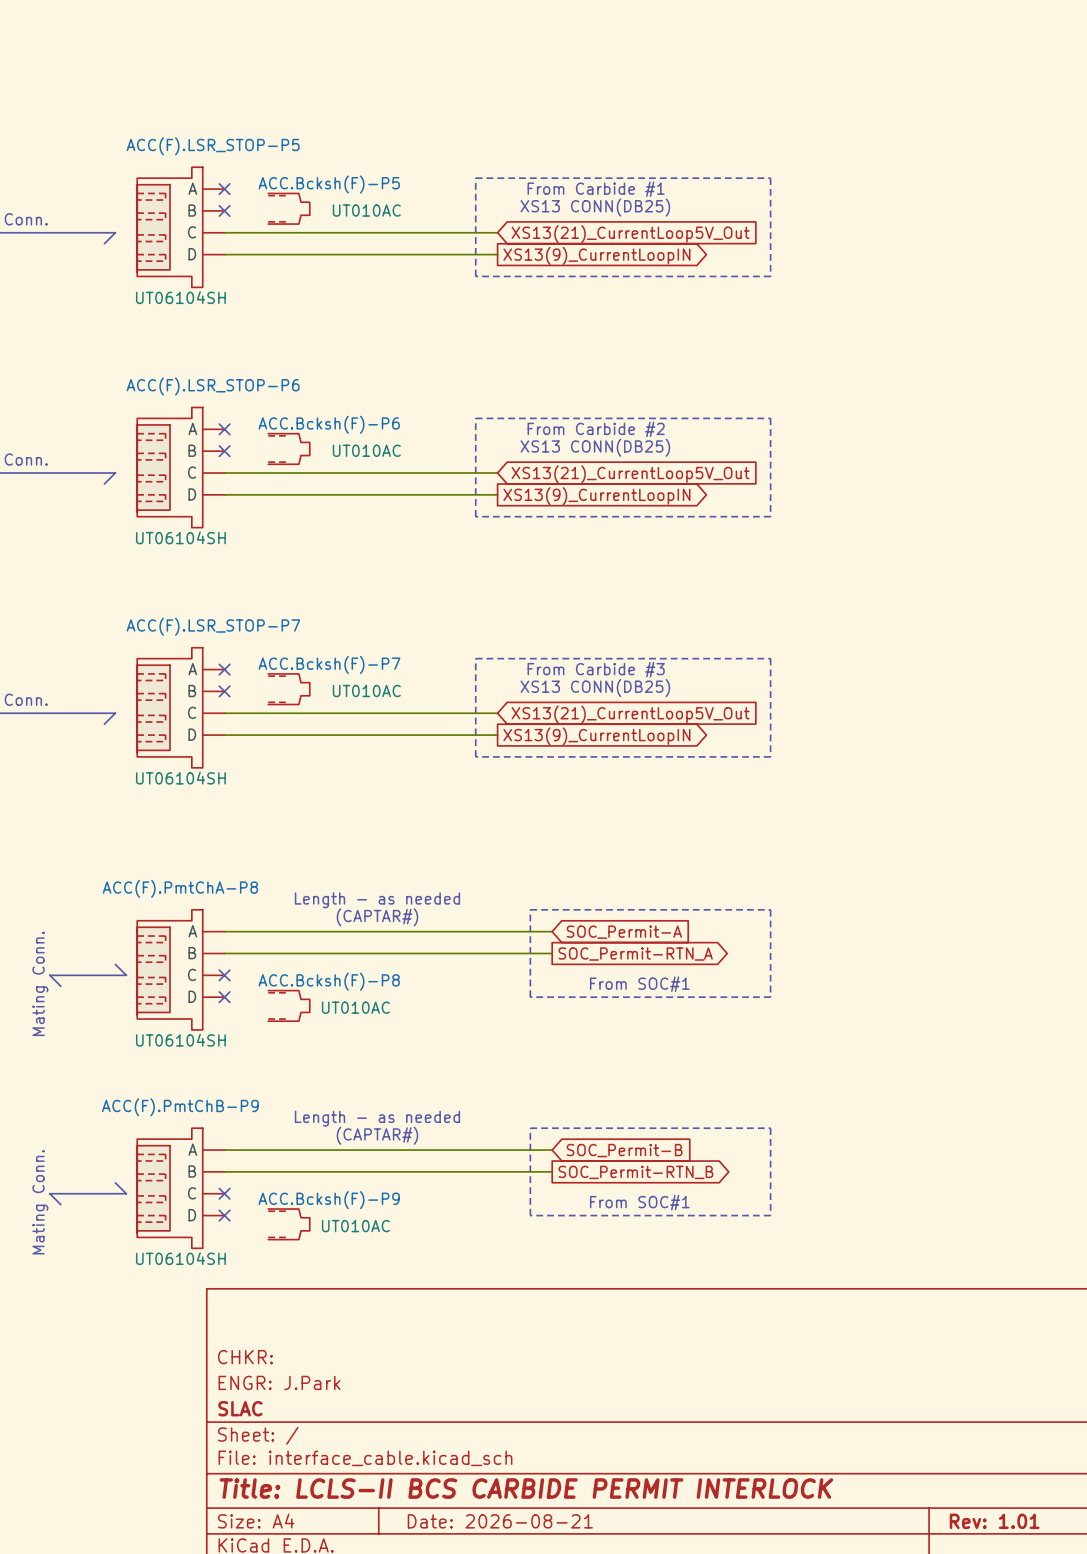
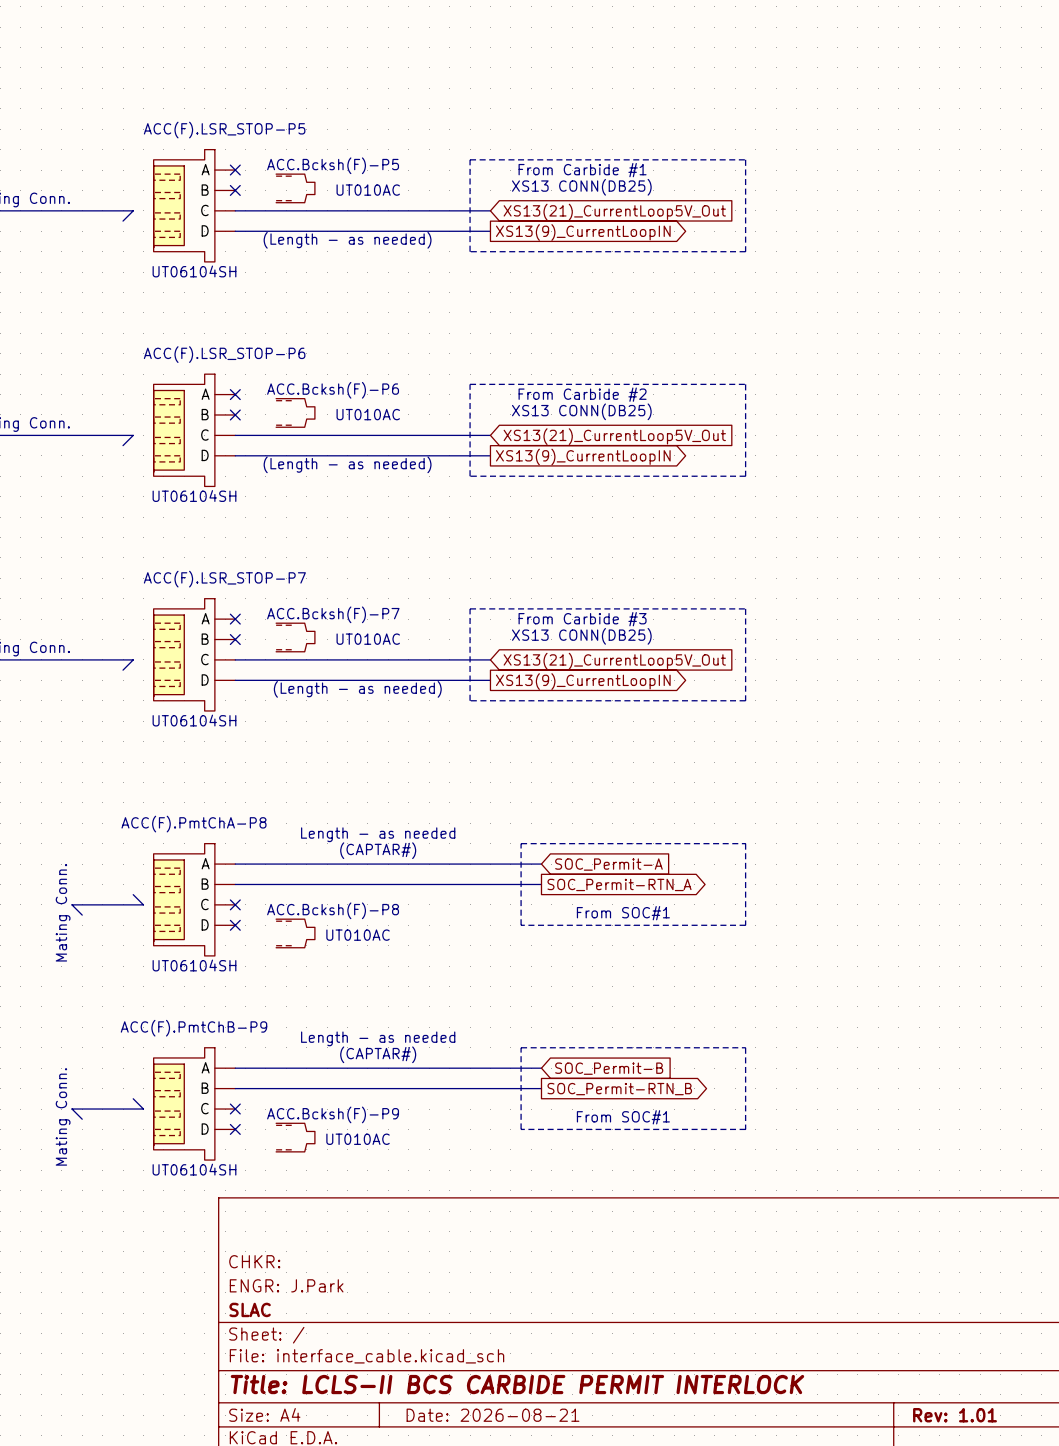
text: none -> (Length - as needed) (347, 240)
text: none -> (Length - as needed) (347, 464)
text: none -> (Length - as needed) (357, 689)

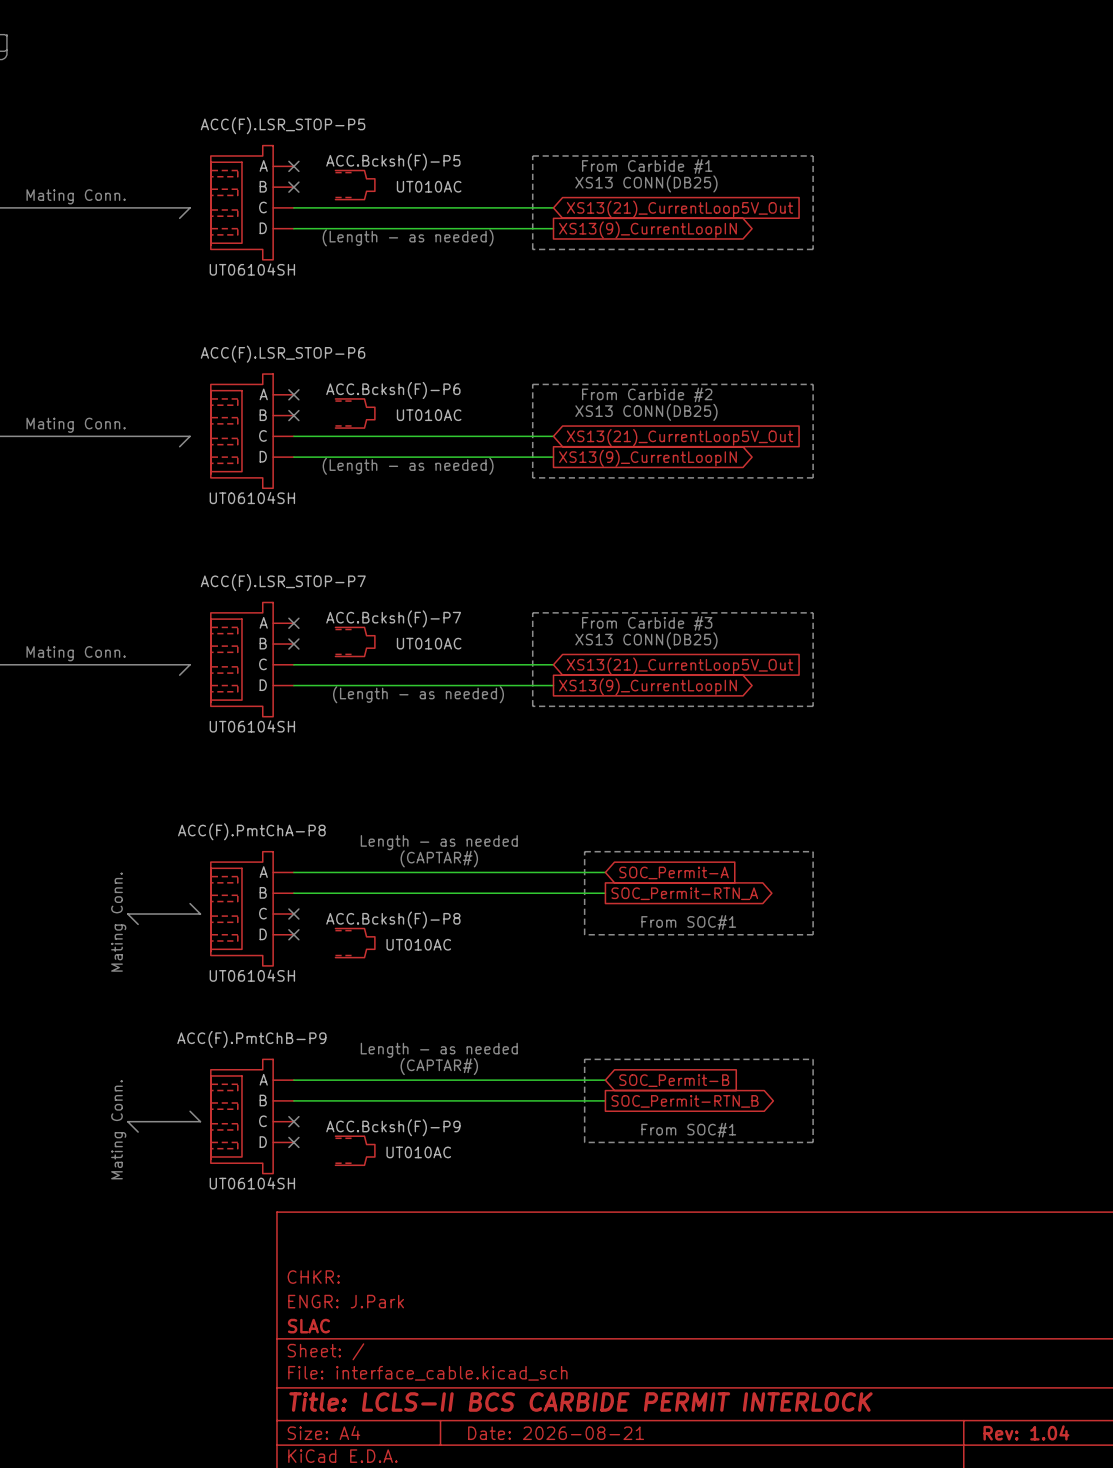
title block: Rev: 1.01 (955, 1415) -> Rev: 1.04 (1026, 1432)

